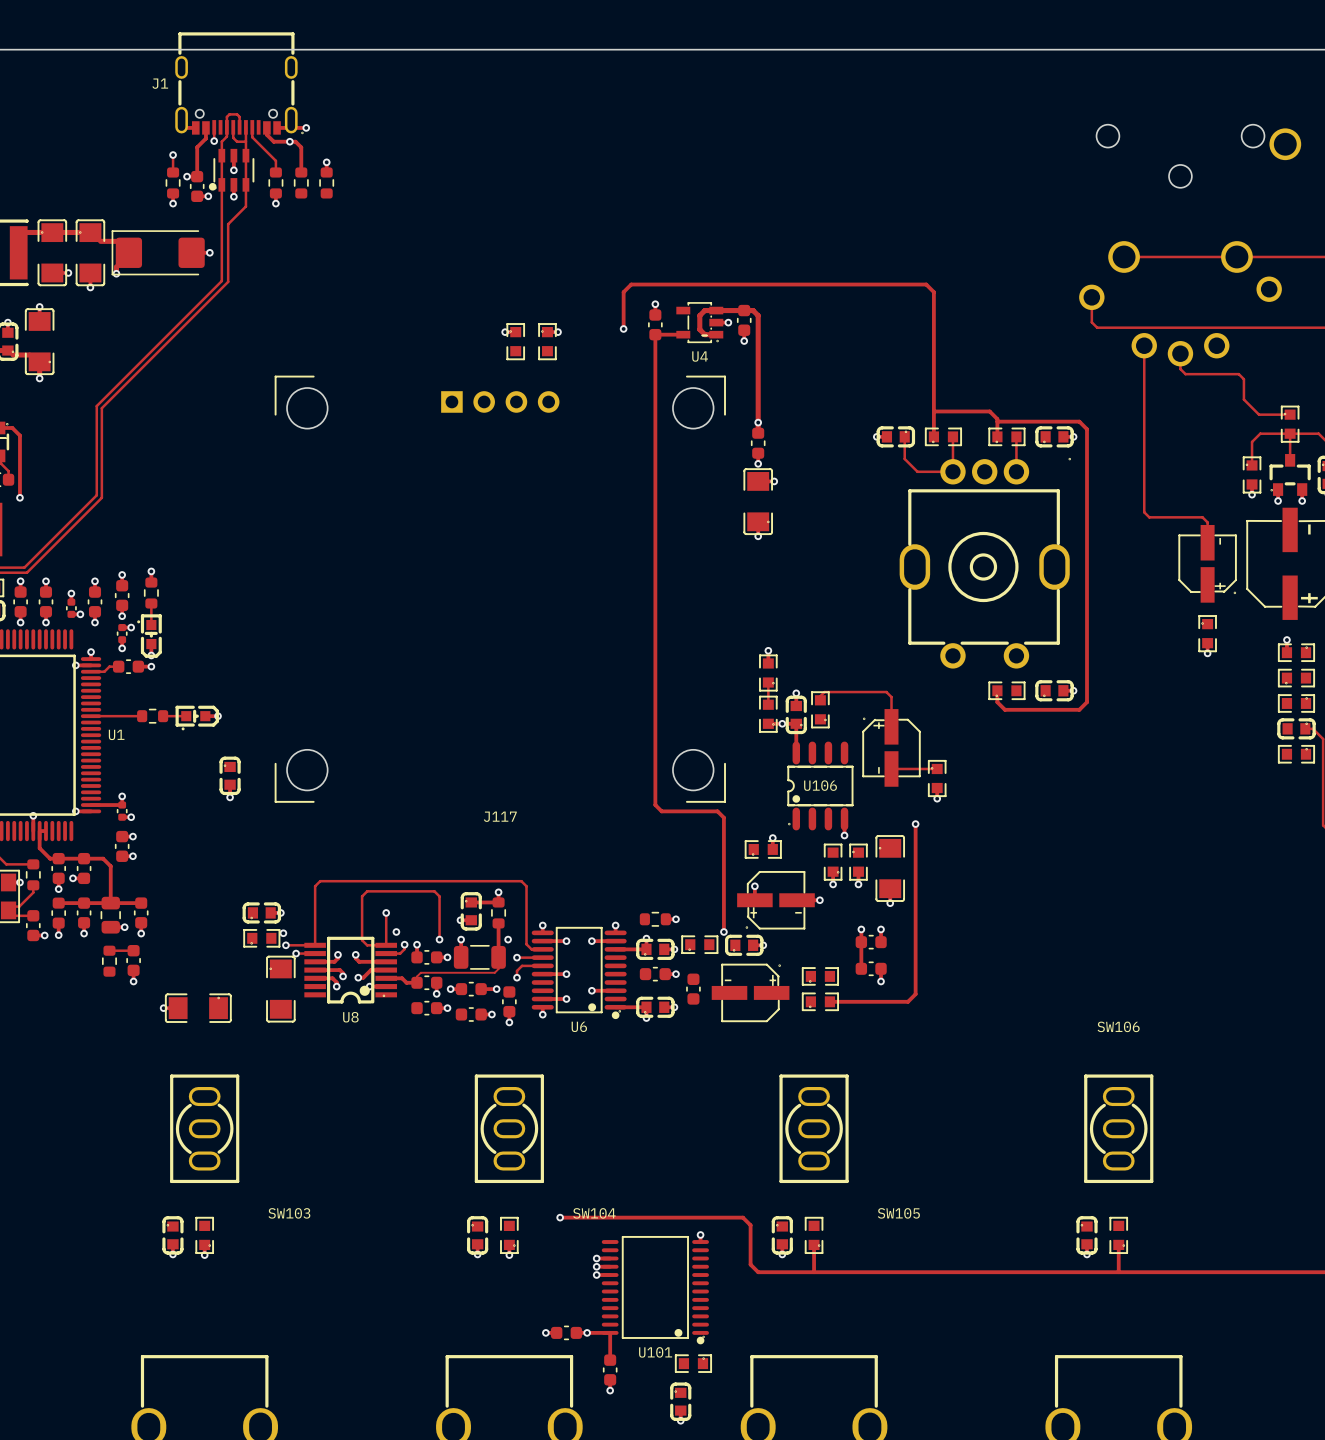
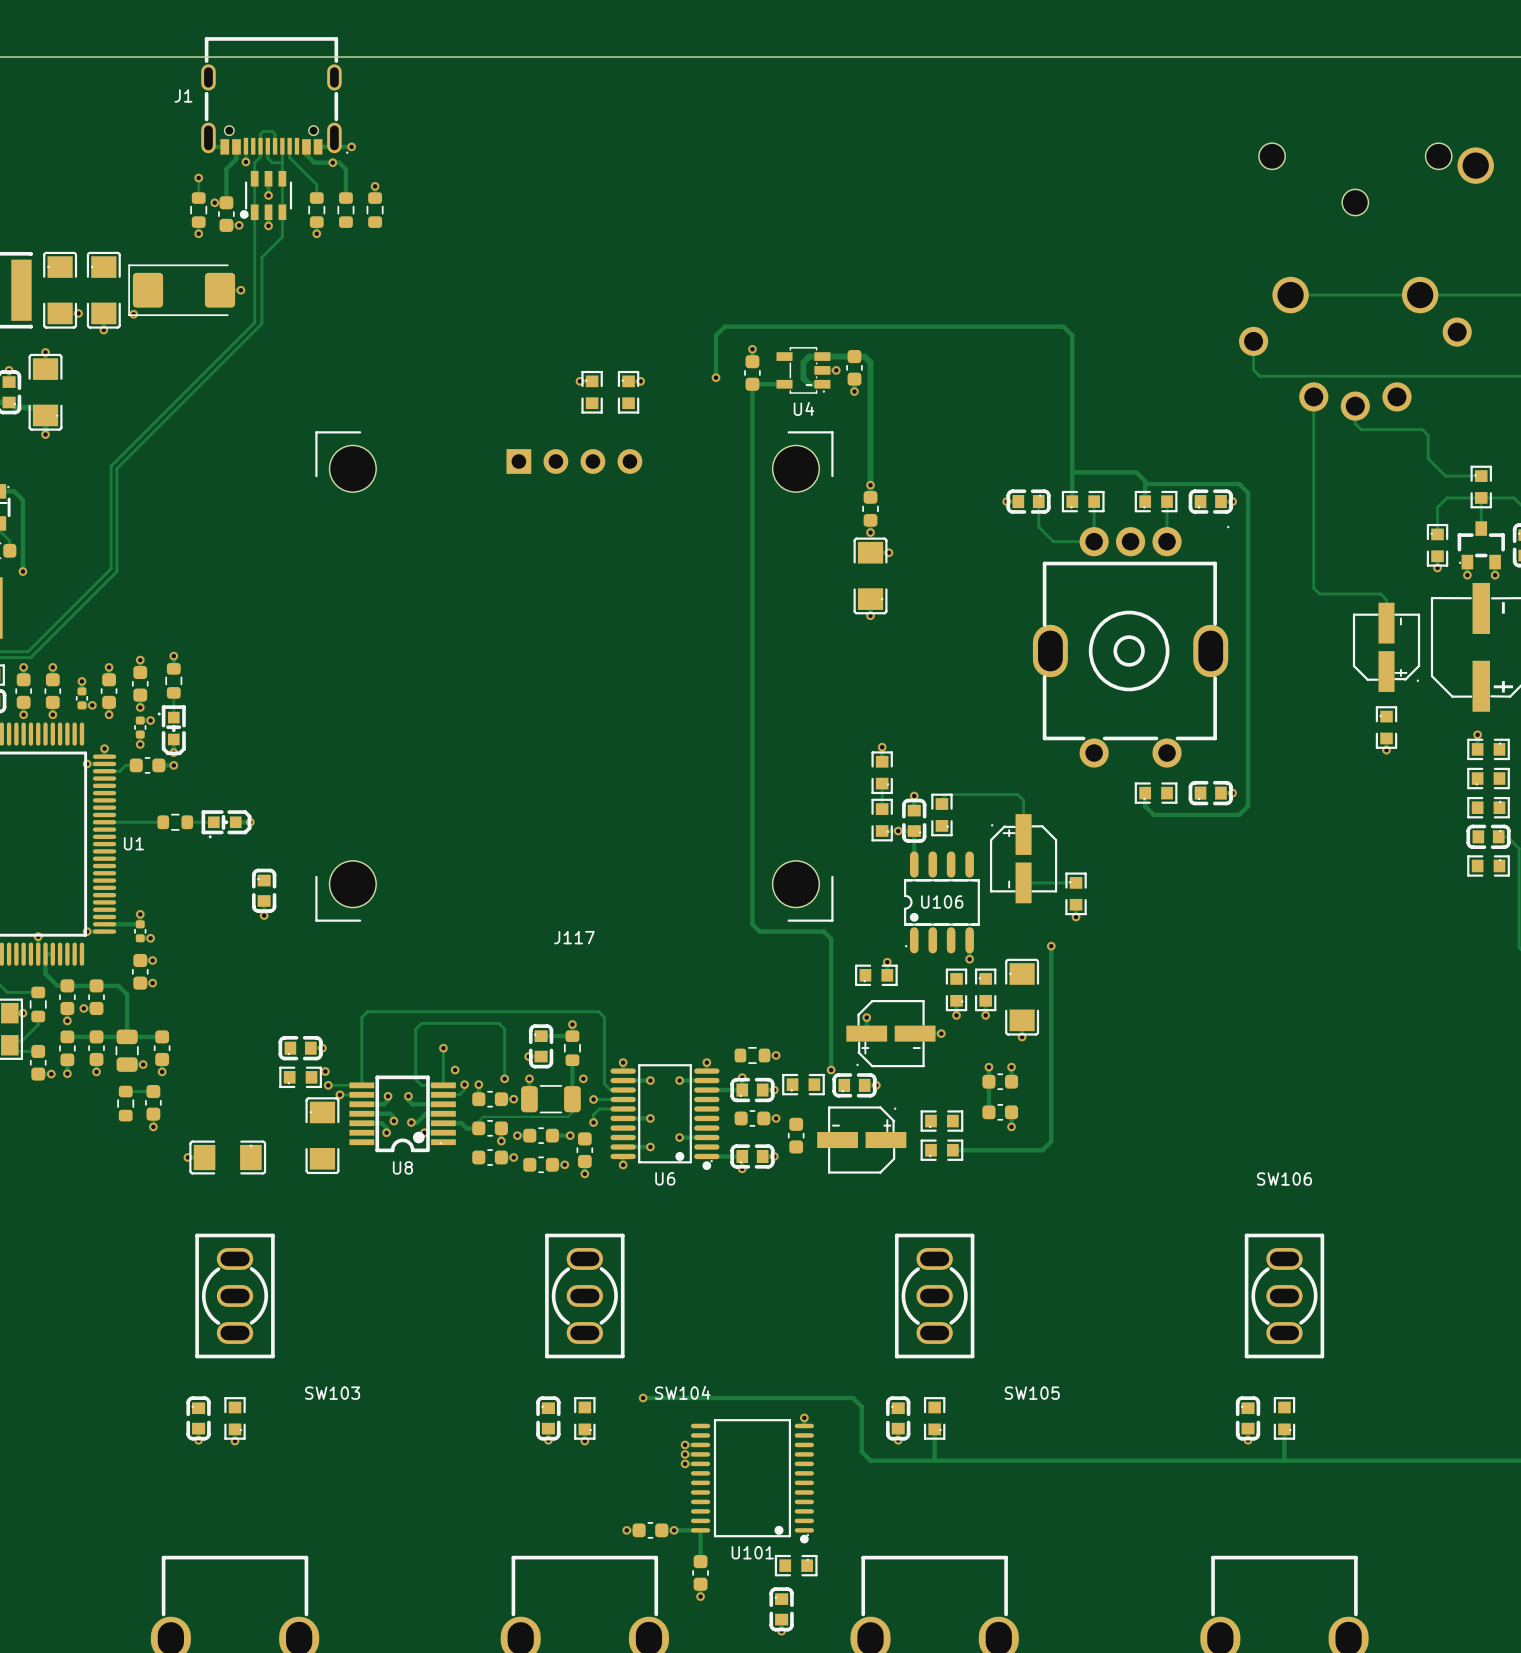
track: (26, 232) (42, 232) -> none
track: (62, 232) (80, 232) -> none
track: (100, 241) (116, 241) -> none
track: (116, 266) (116, 273) -> none

